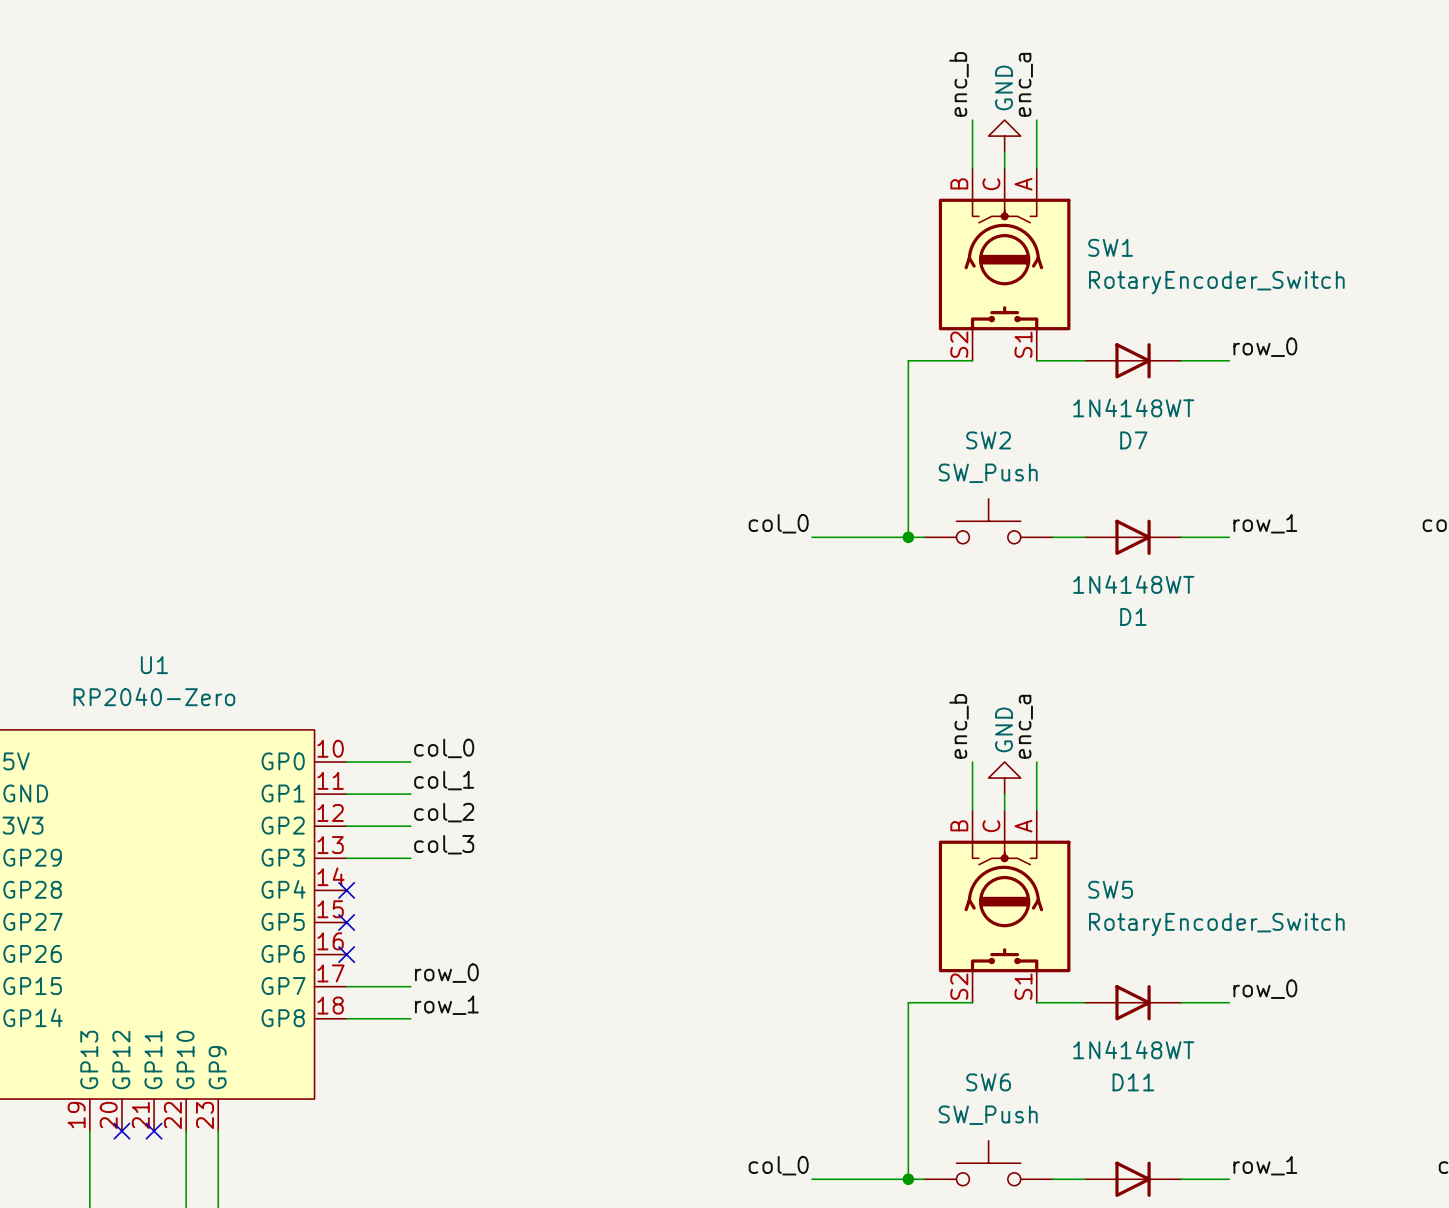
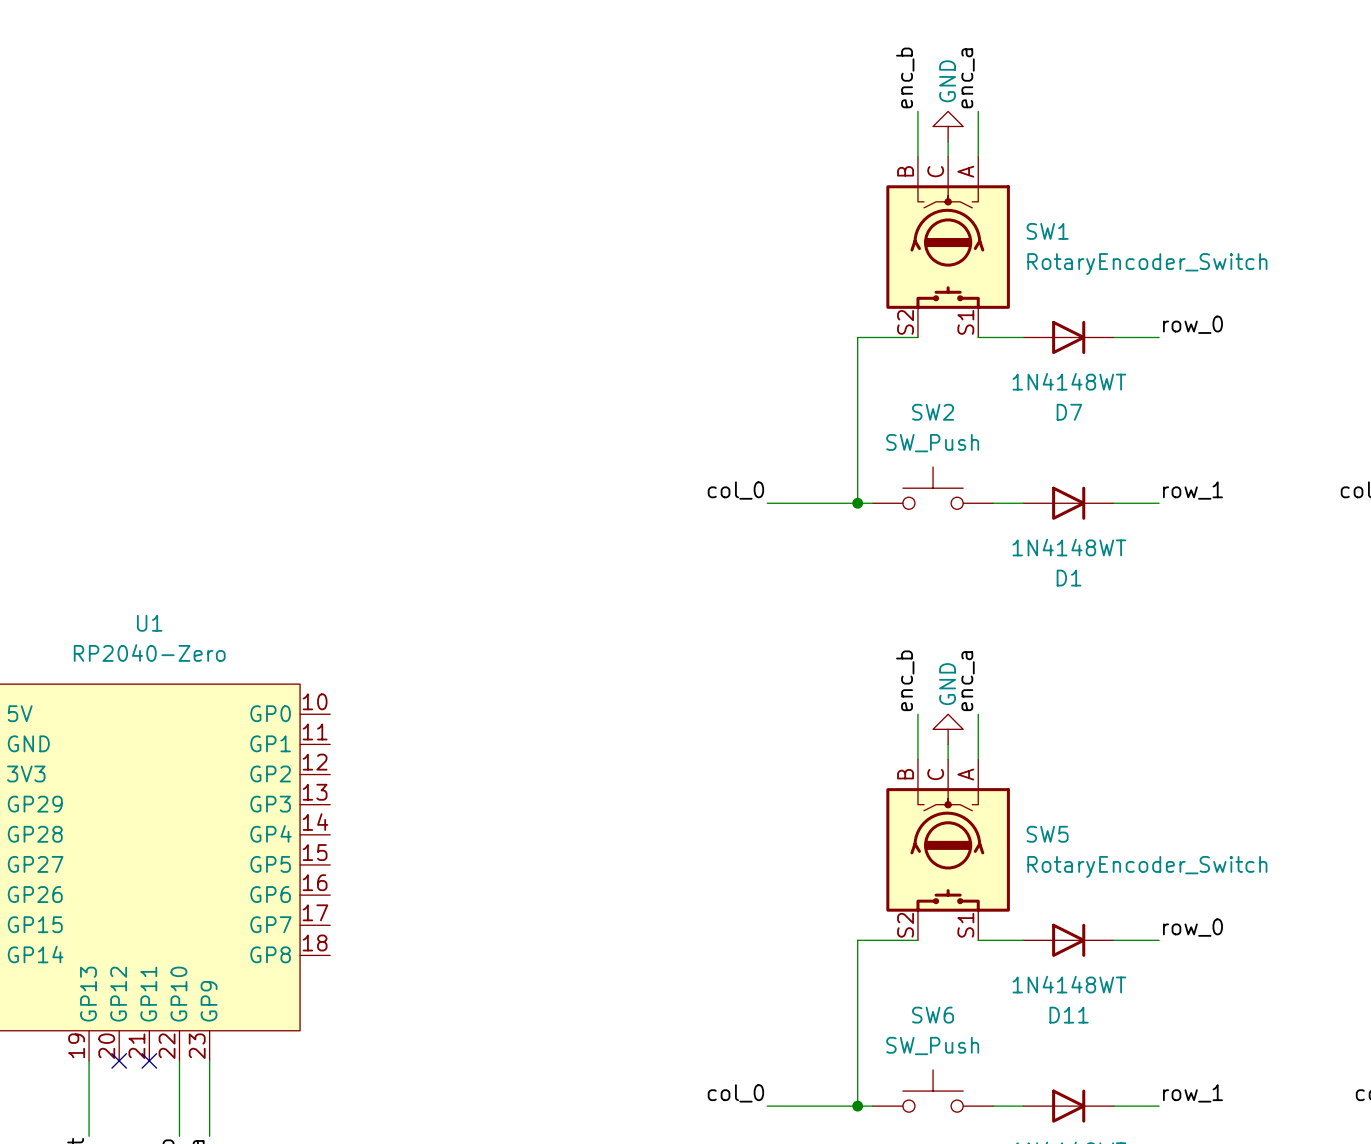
label: col_0 (444, 748) -> none
wire: (346, 762) (410, 762) -> none
label: col_1 (444, 780) -> none
wire: (346, 794) (410, 794) -> none
label: col_2 (444, 812) -> none
wire: (346, 826) (410, 826) -> none
label: col_3 (444, 844) -> none
wire: (346, 858) (410, 858) -> none
no-connect mark: (346, 890) -> none
no-connect mark: (346, 922) -> none
no-connect mark: (346, 954) -> none
label: row_0 (446, 973) -> none
wire: (346, 986) (410, 986) -> none
label: row_1 (446, 1005) -> none
wire: (346, 1018) (410, 1018) -> none

